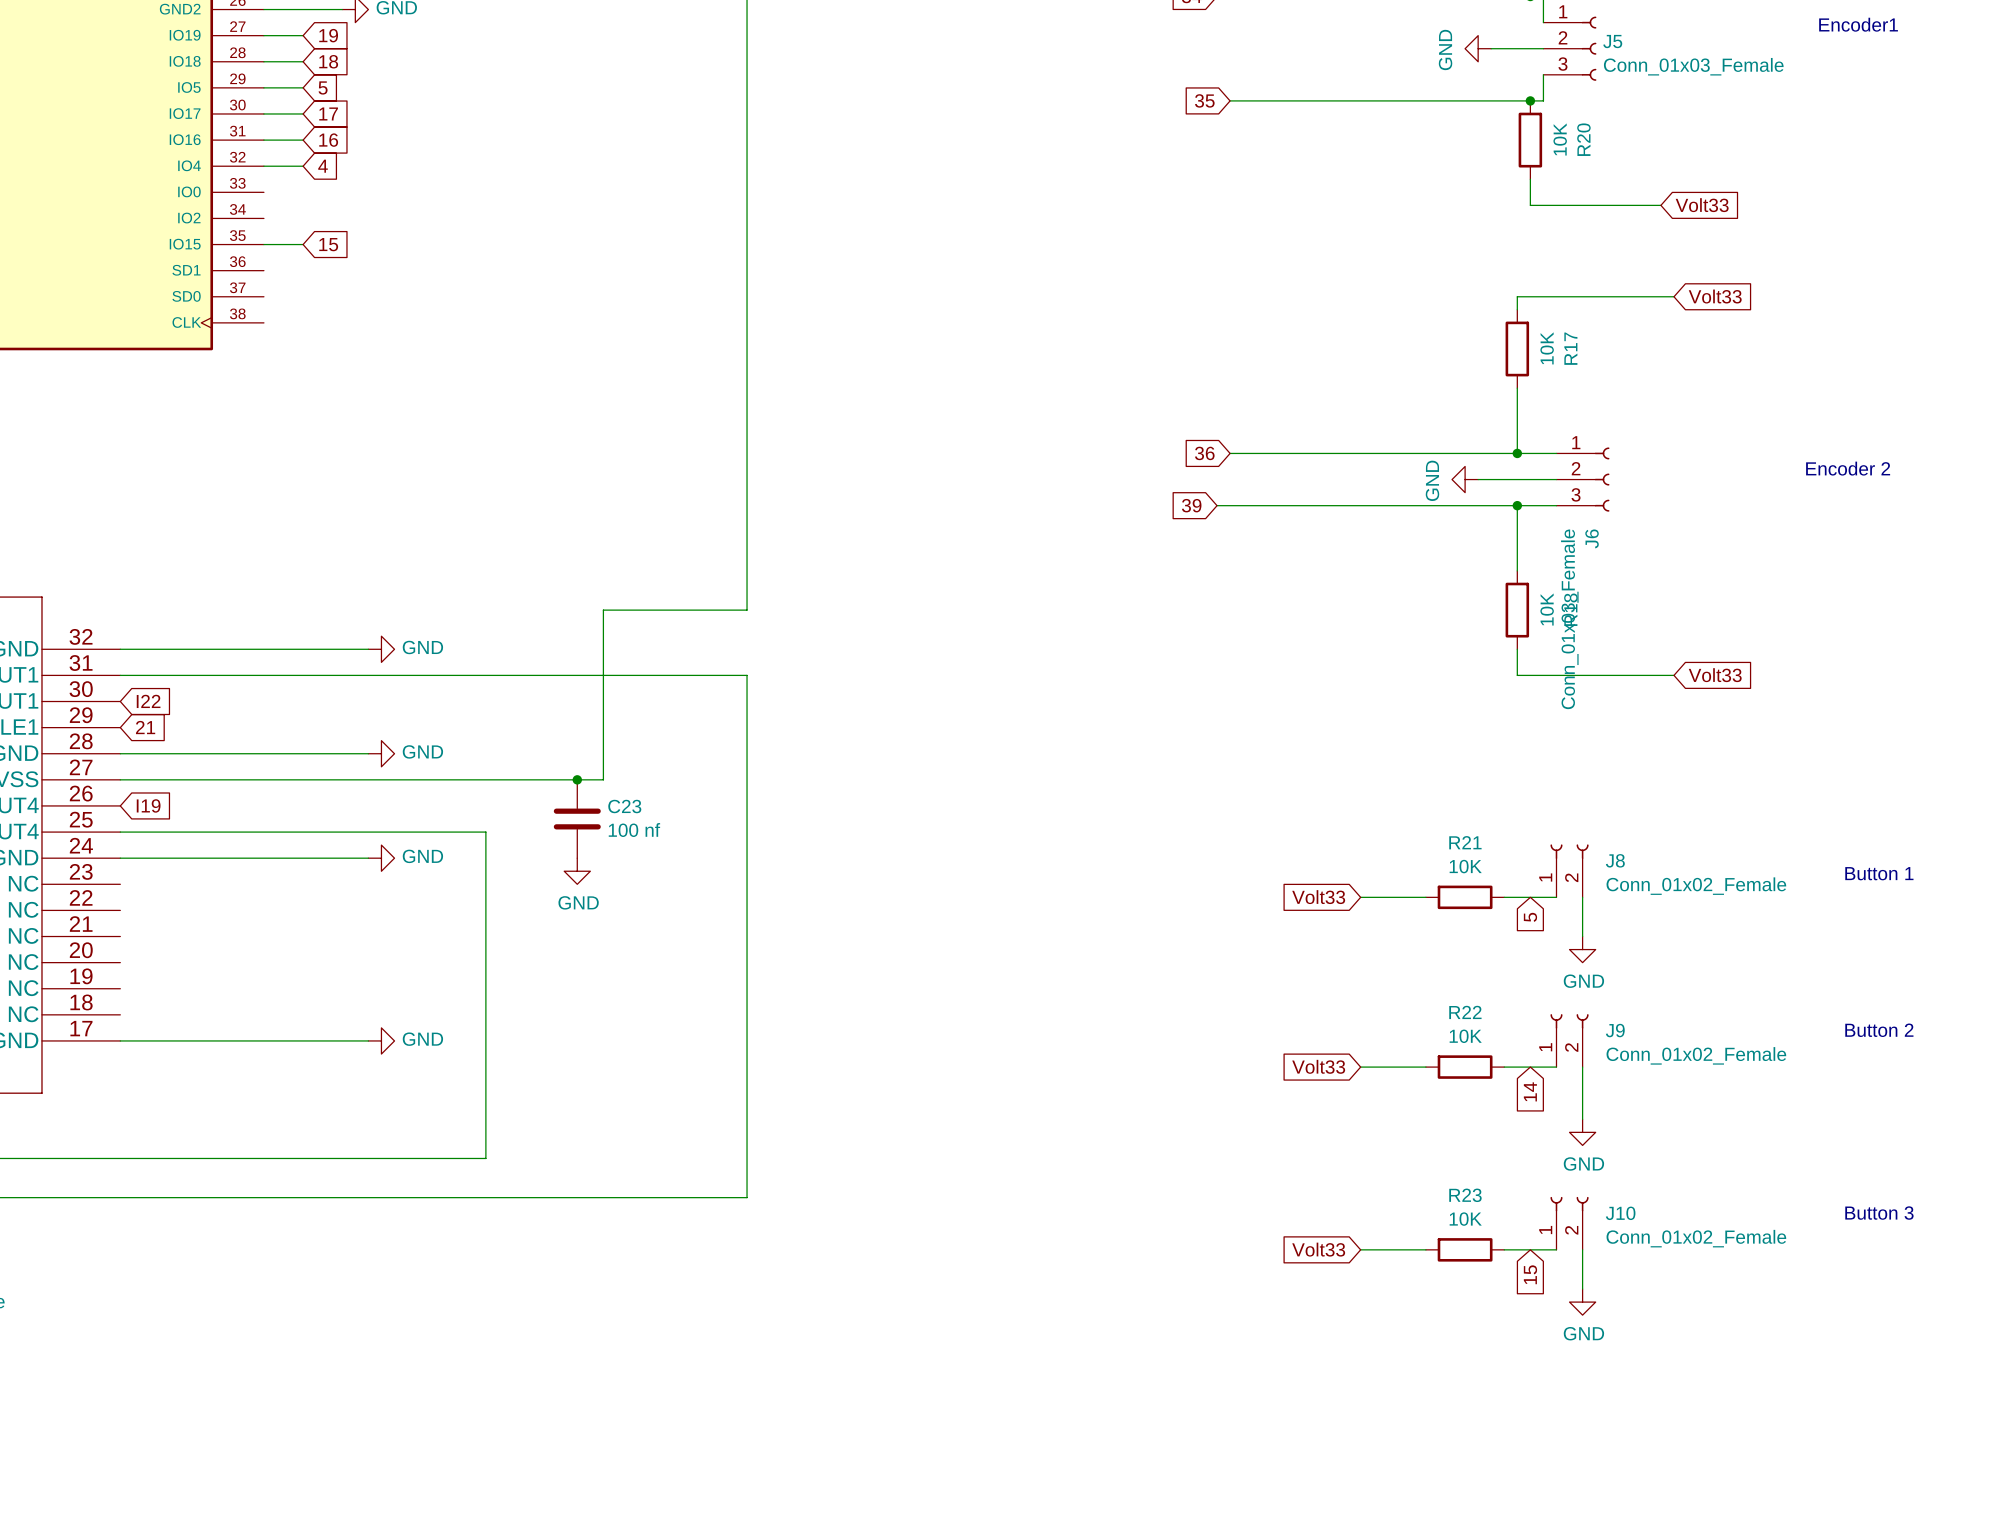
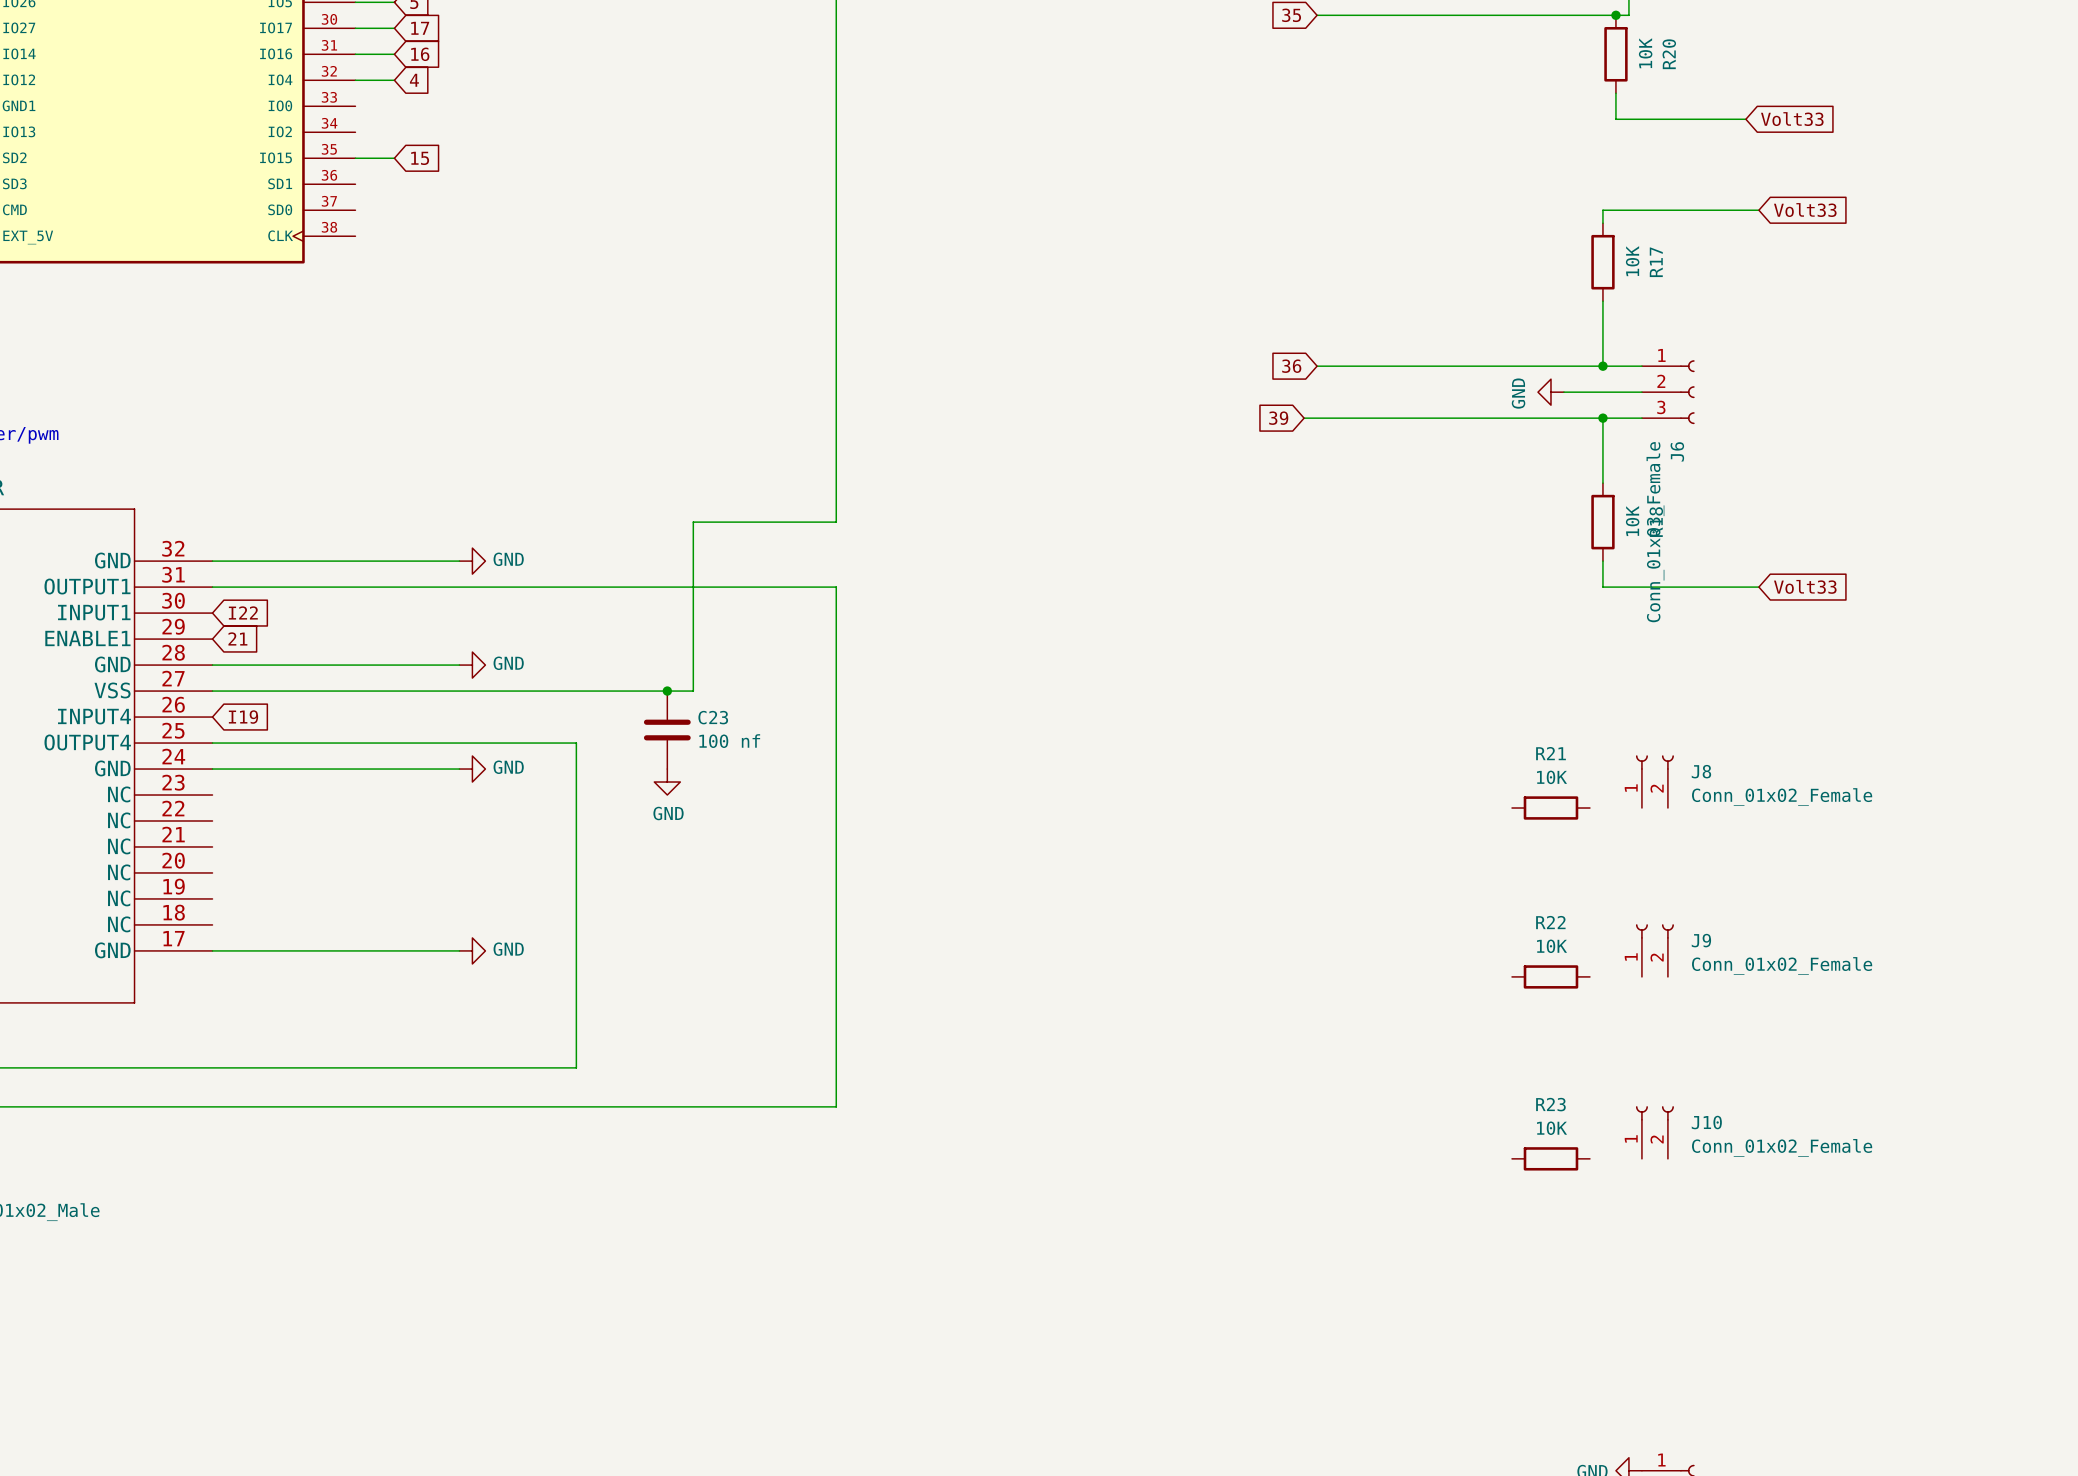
text: Encoder 2 (1848, 468) -> none
text: Button 1 (1879, 873) -> none
global label: Volt33 (1318, 897) -> none
wire: (1360, 897) (1425, 897) -> none
wire: (1504, 897) (1556, 897) -> none
wire: (1582, 897) (1582, 936) -> none
global label: 5 (1530, 917) -> none
power symbol: GND (1582, 949) -> none
text: Button 2 (1879, 1030) -> none
global label: Volt33 (1318, 1066) -> none
wire: (1360, 1067) (1425, 1067) -> none
wire: (1504, 1067) (1556, 1067) -> none
wire: (1582, 1067) (1582, 1119) -> none
global label: 14 (1530, 1091) -> none
power symbol: GND (1582, 1132) -> none
text: Button 3 (1879, 1213) -> none
global label: Volt33 (1318, 1249) -> none
wire: (1360, 1249) (1425, 1249) -> none
wire: (1504, 1249) (1556, 1249) -> none
wire: (1582, 1249) (1582, 1289) -> none
global label: 15 (1530, 1274) -> none
power symbol: GND (1582, 1302) -> none

